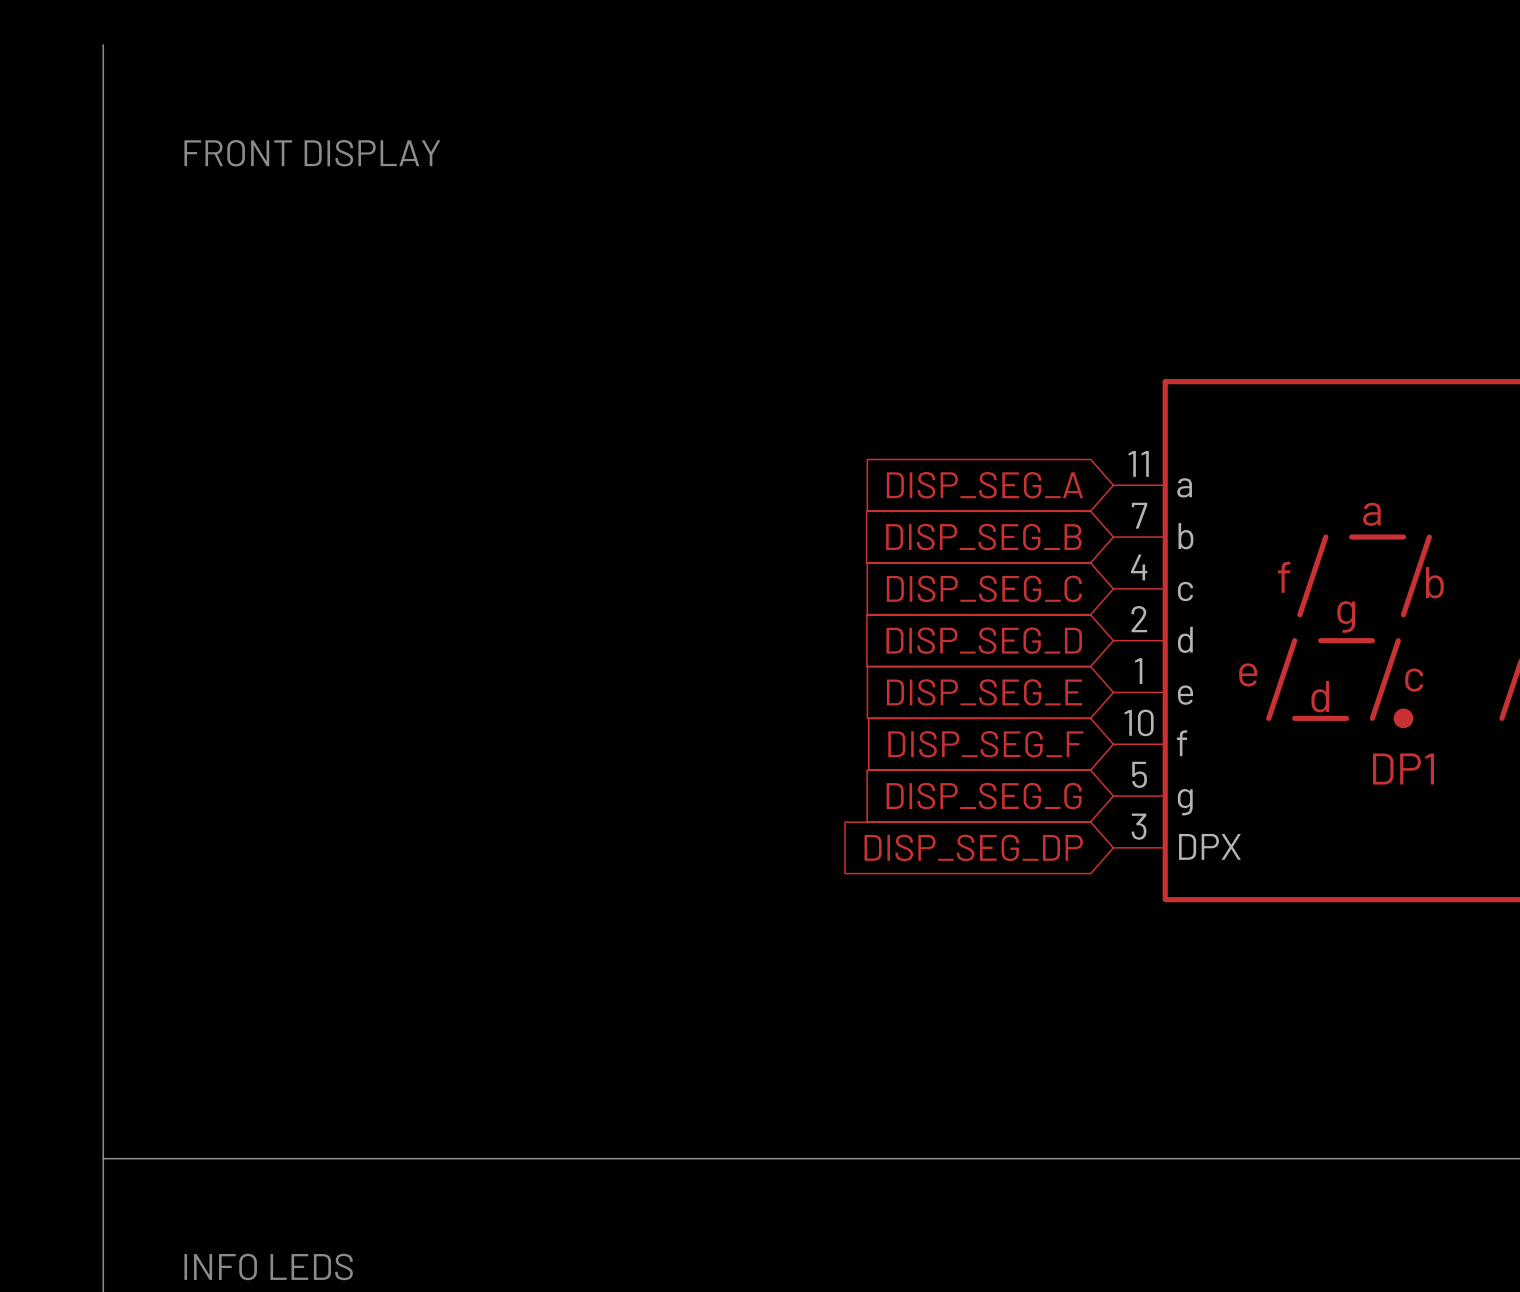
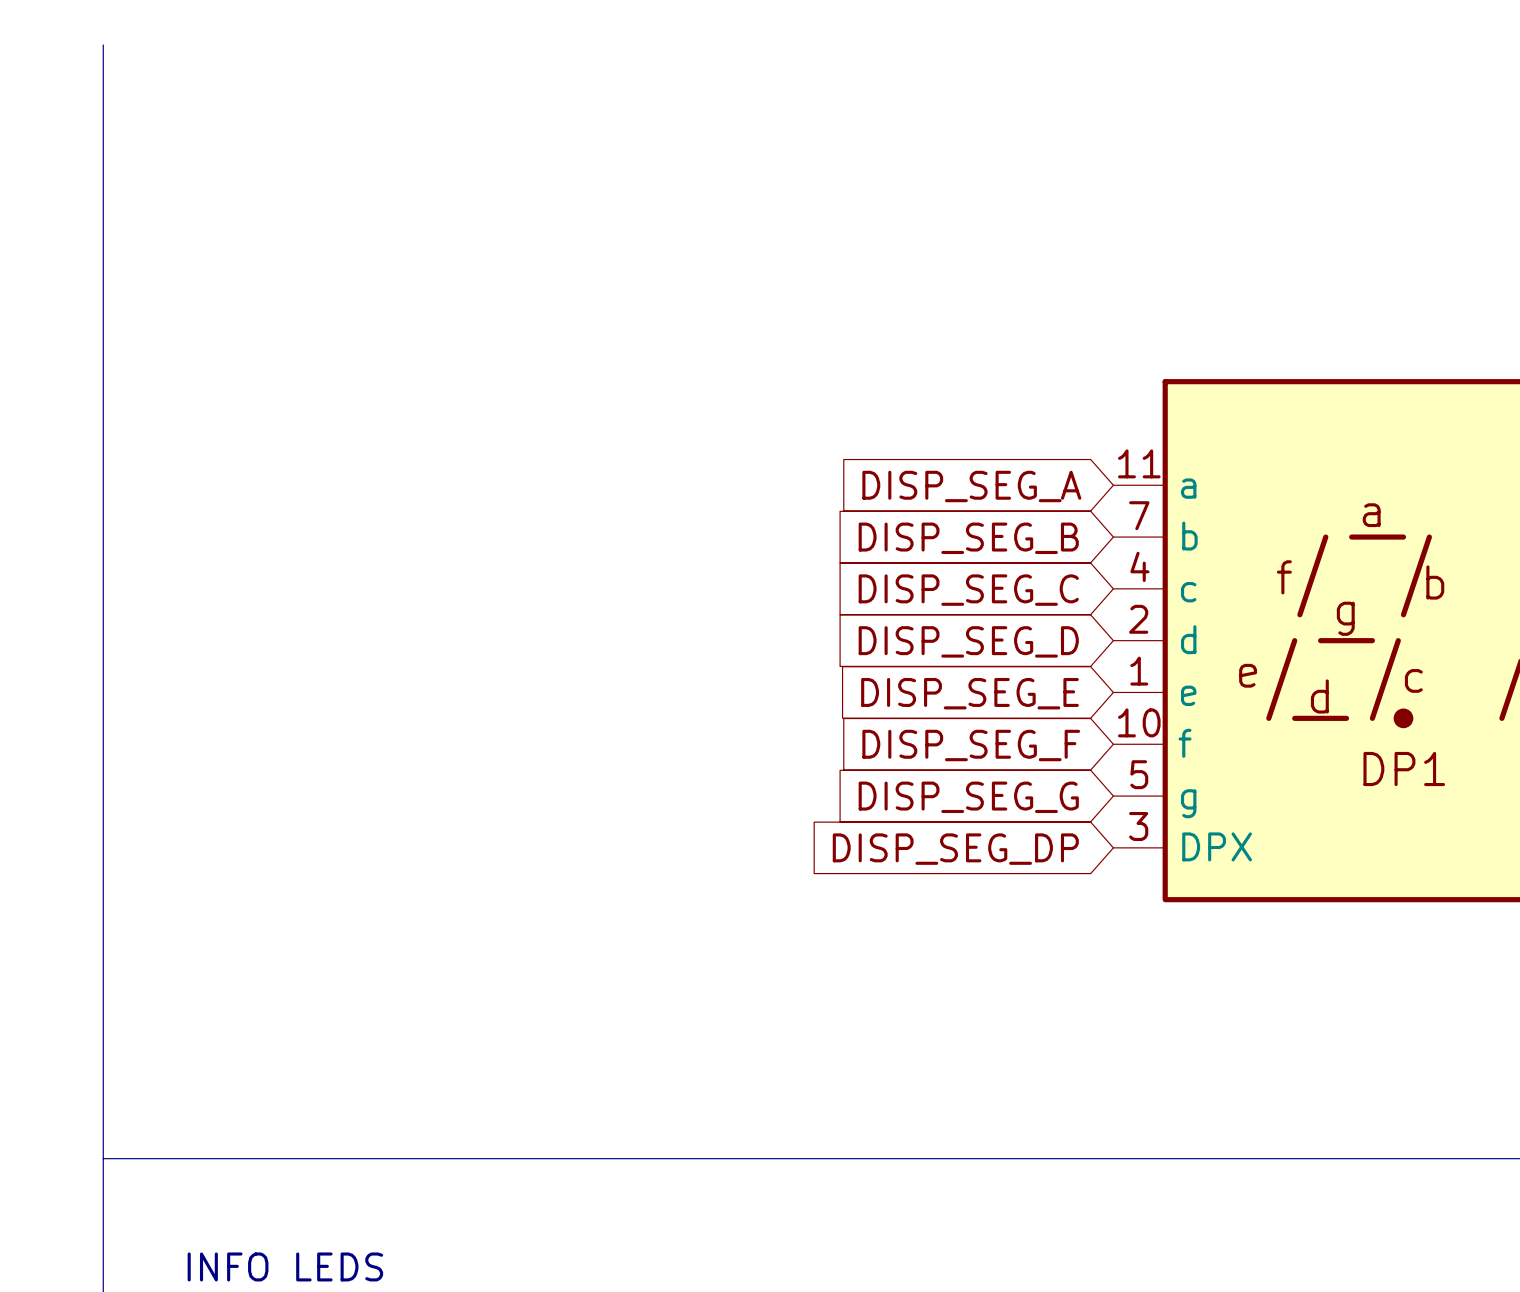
text: FRONT DISPLAY (312, 153) -> none

